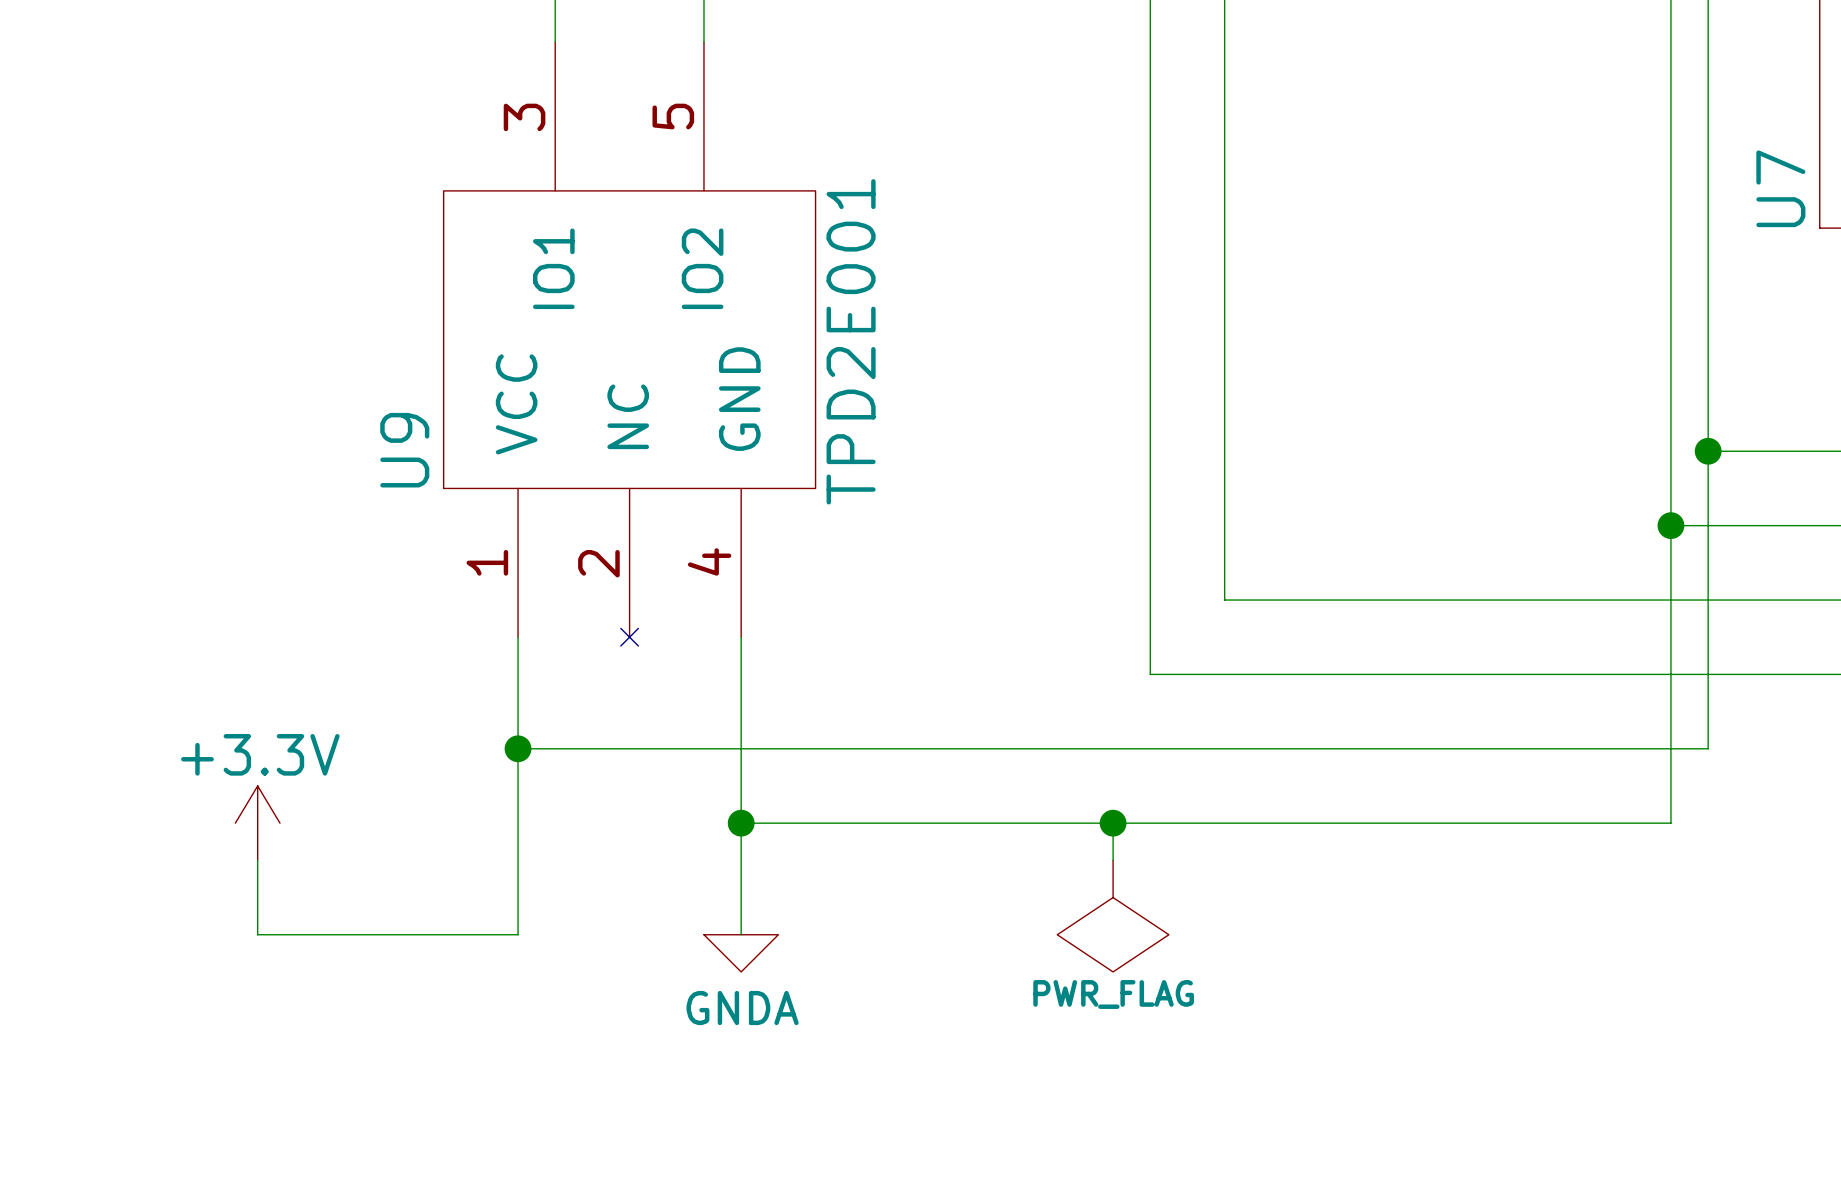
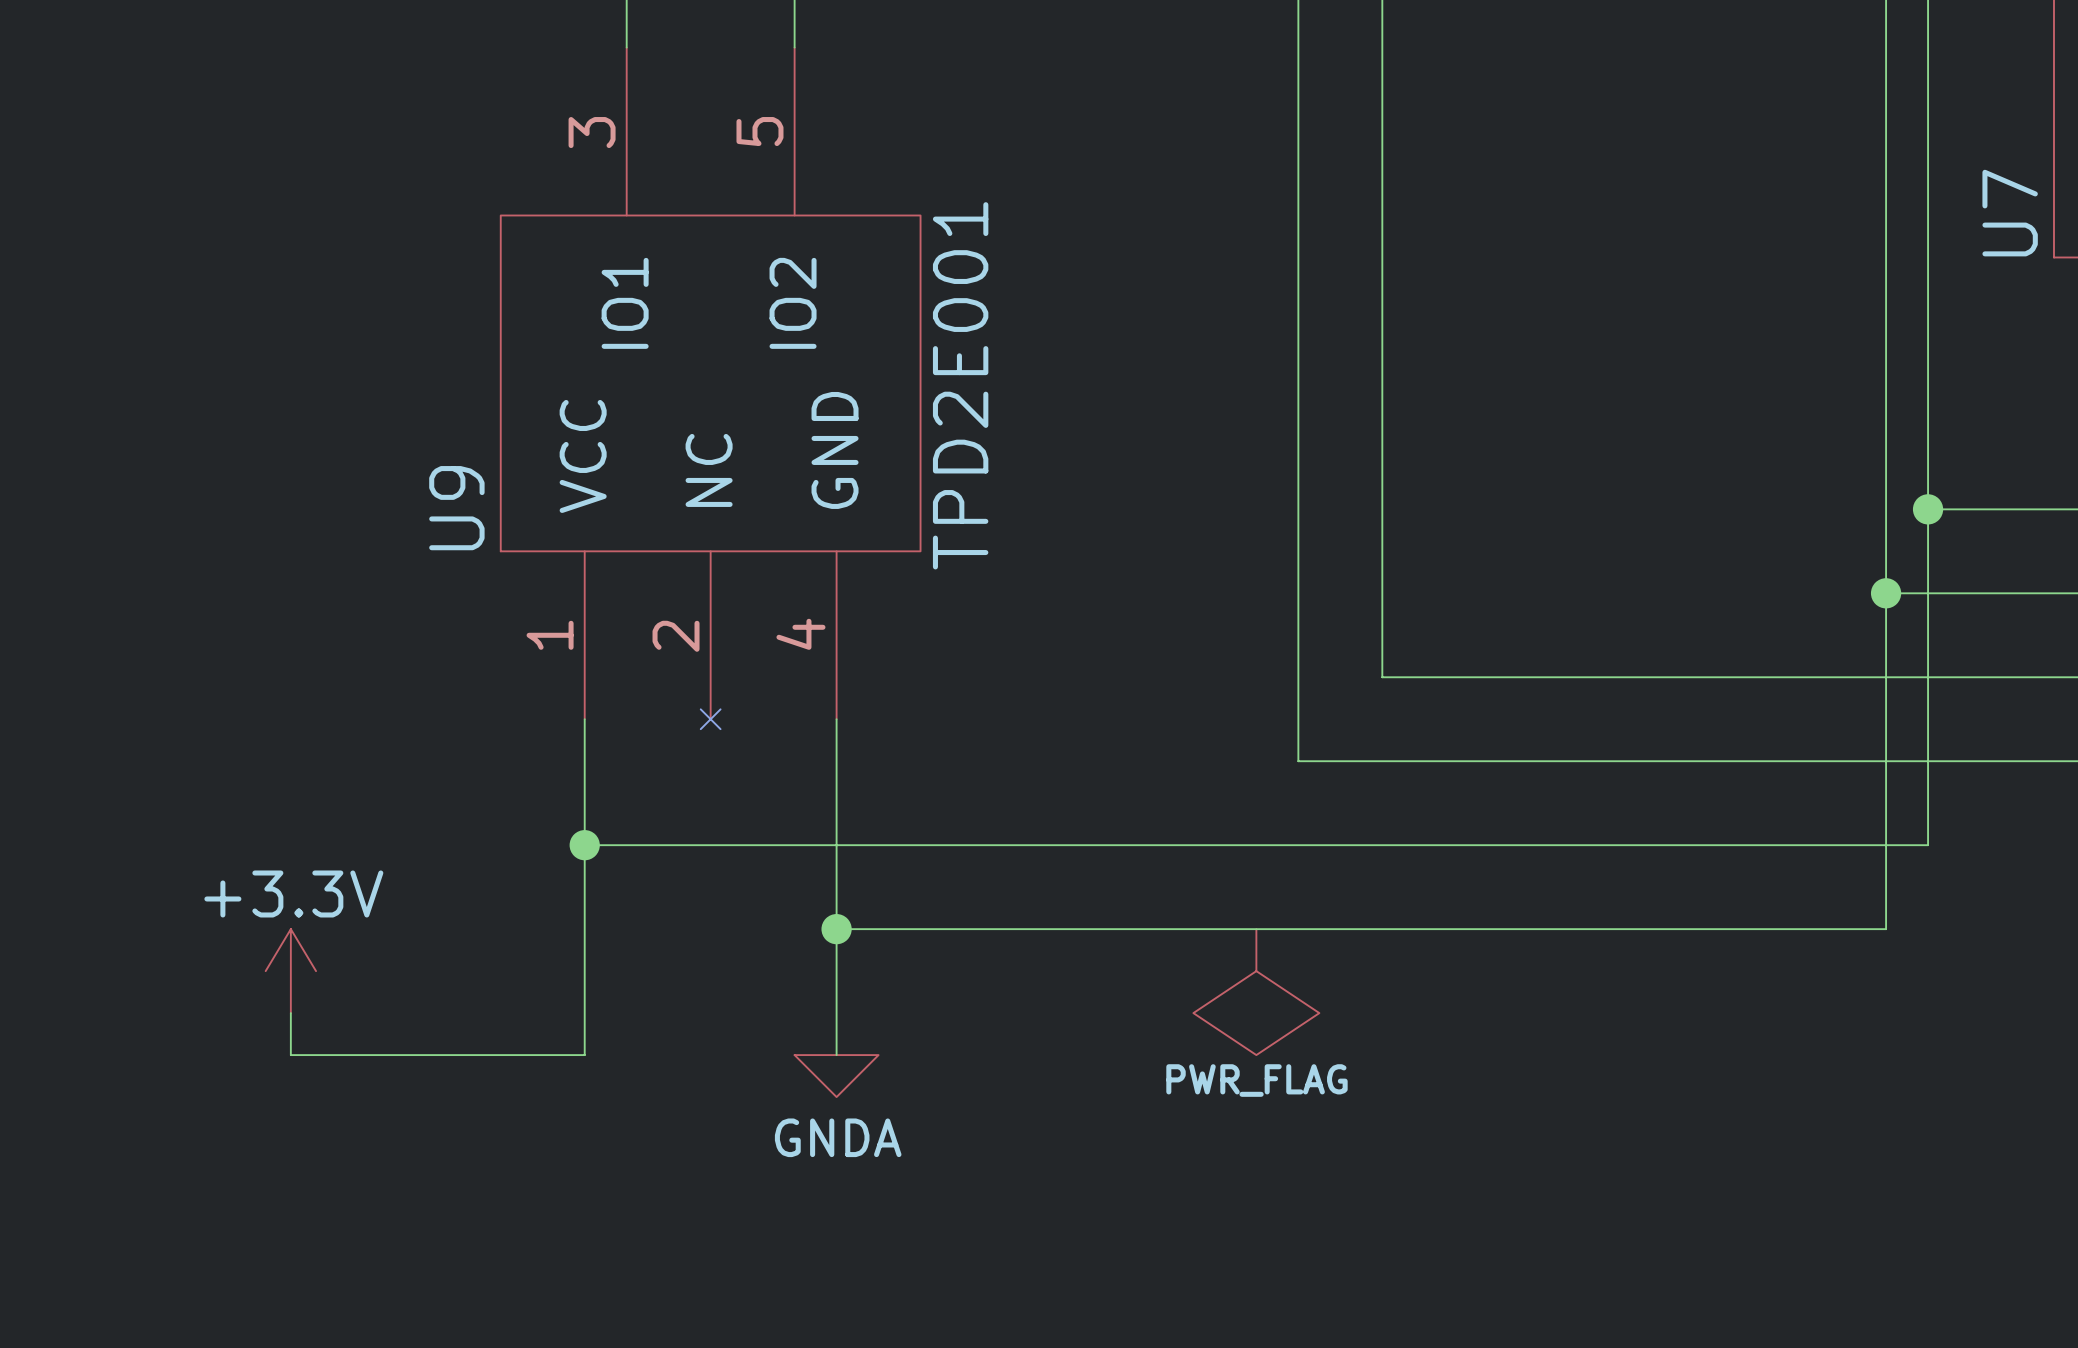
power symbol position: +3.3V (257, 823) -> +3.3V (290, 971)
junction: (1113, 823) -> none
power symbol position: PWR_FLAG (1113, 916) -> PWR_FLAG (1256, 992)

